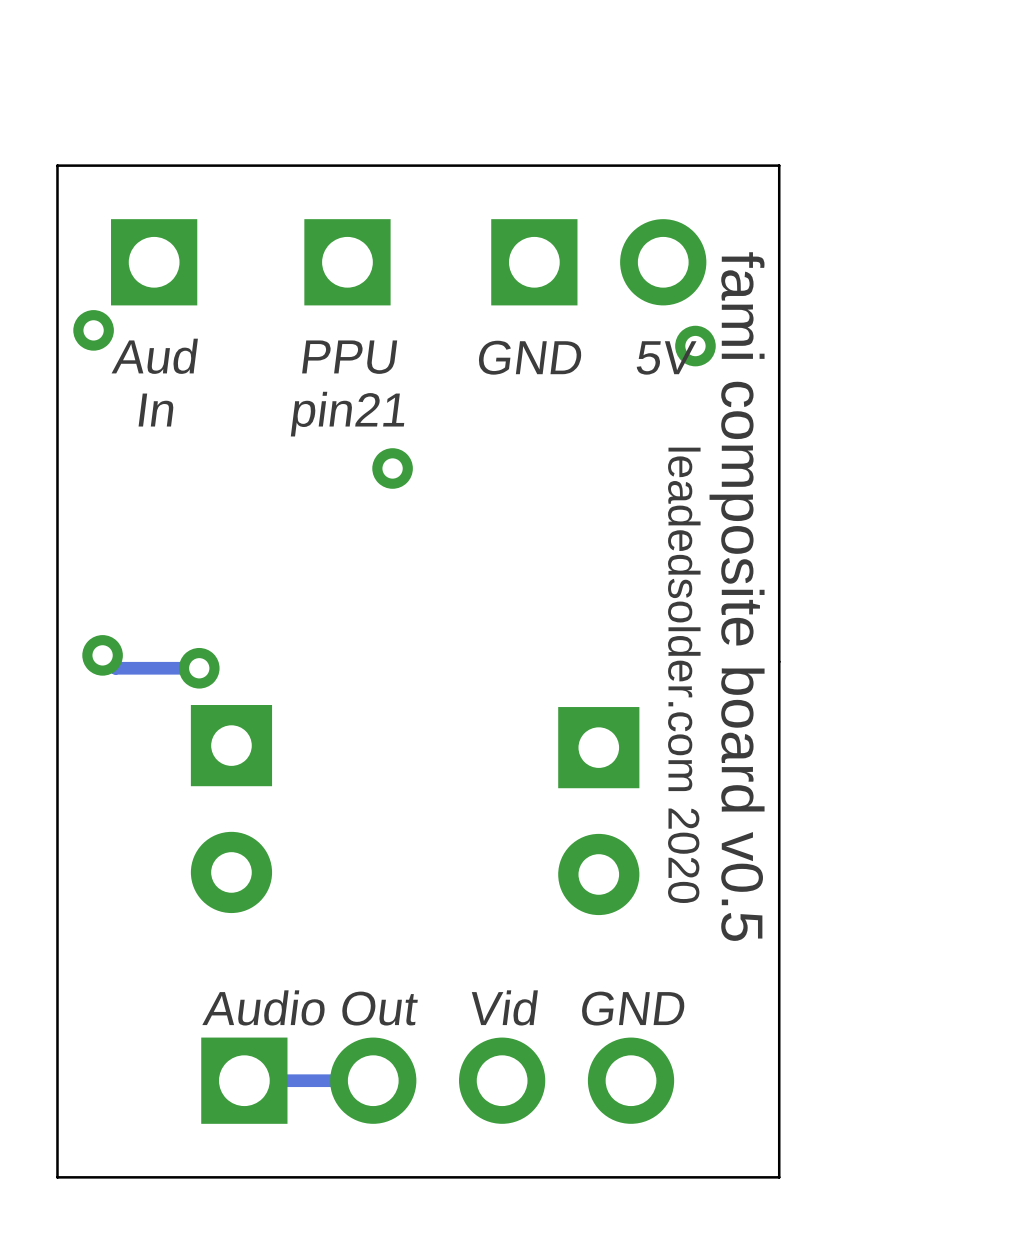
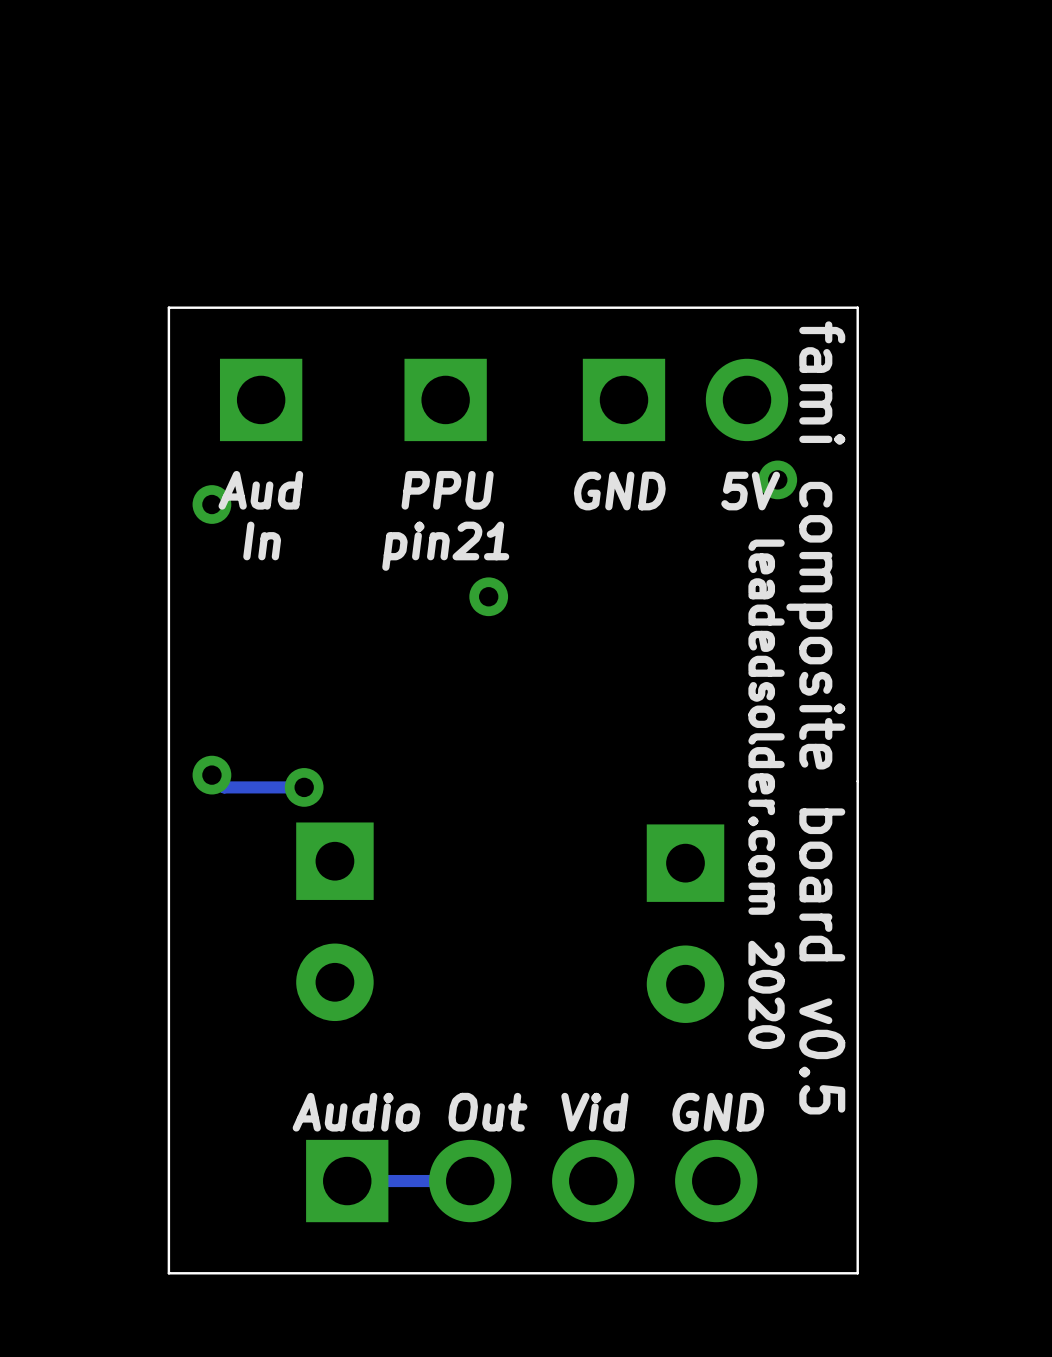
via position: (93, 330) -> (211, 504)

